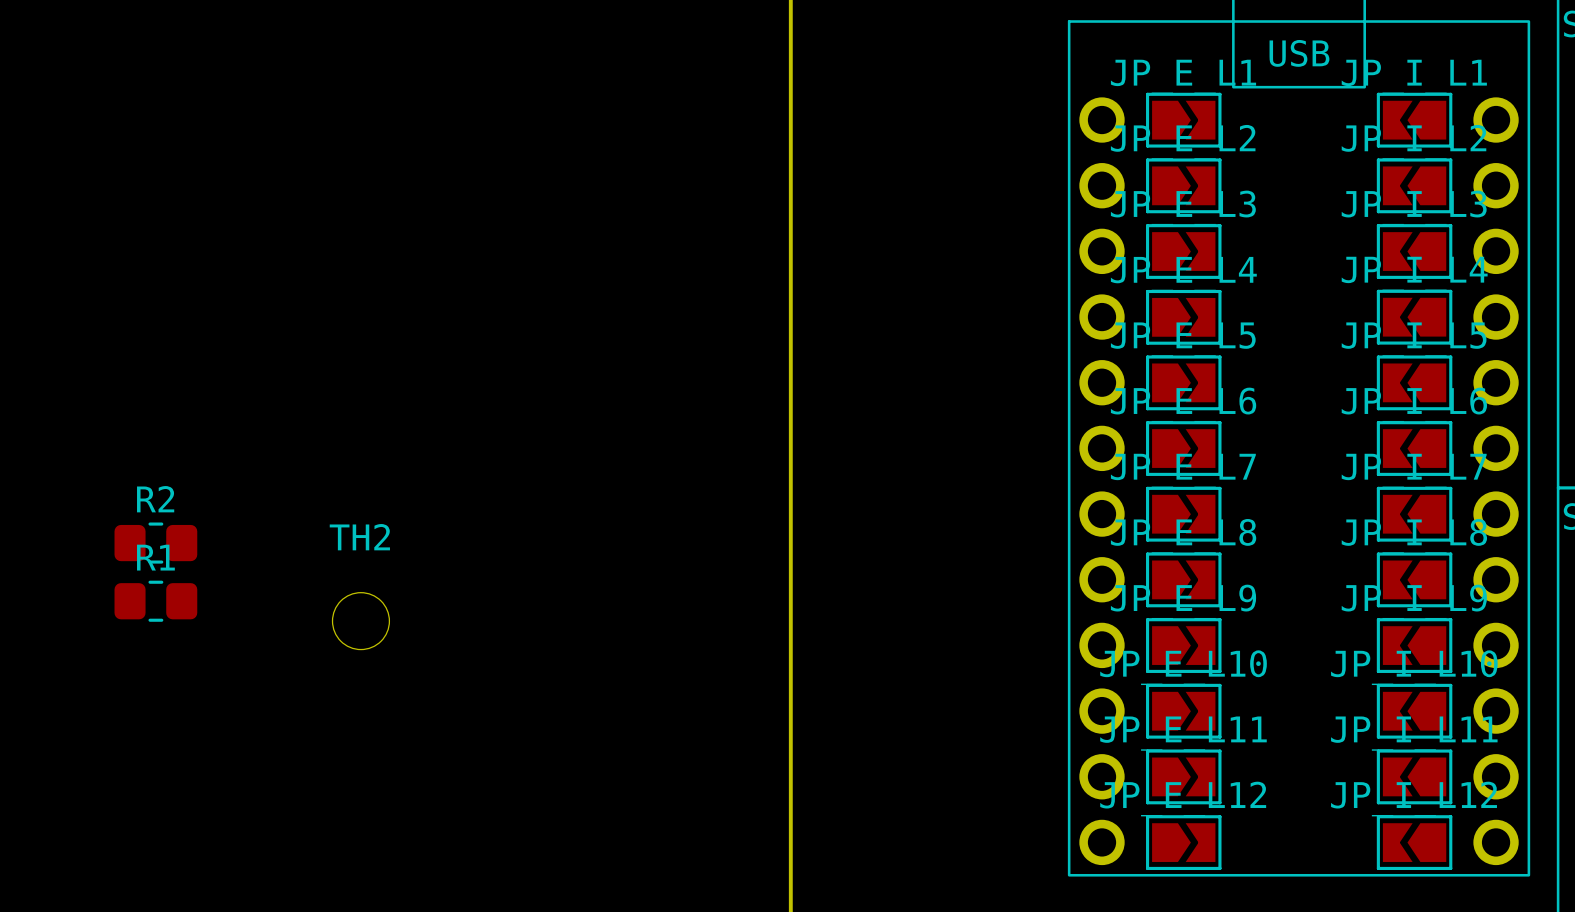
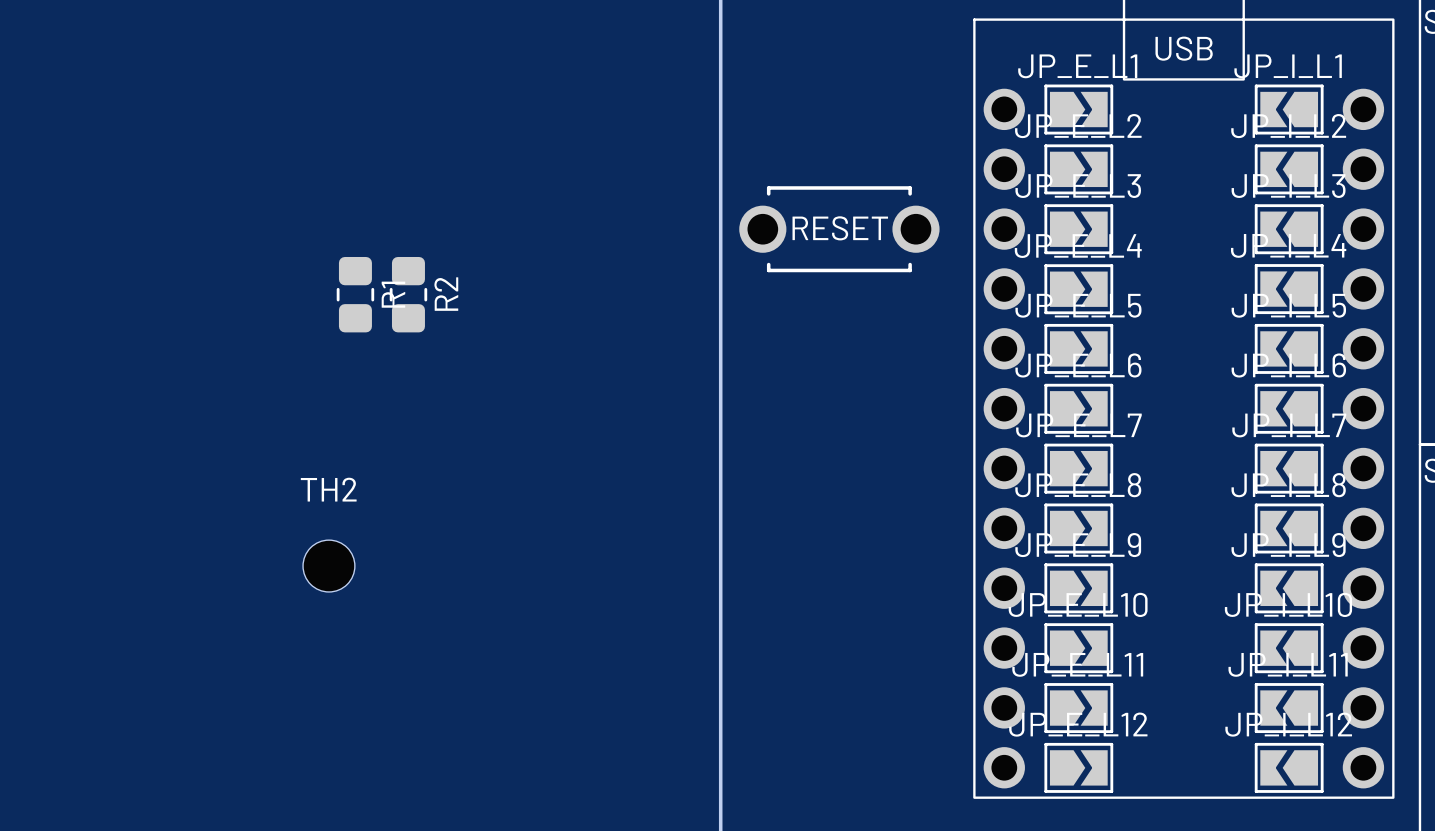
part: none -> (839, 229)
R2 rotation: 0° (155, 543) -> 90° clockwise (408, 294)
R2 position: (155, 543) -> (408, 294)
R1 rotation: 0° (155, 601) -> 90° clockwise (355, 294)
R1 position: (155, 601) -> (355, 294)

